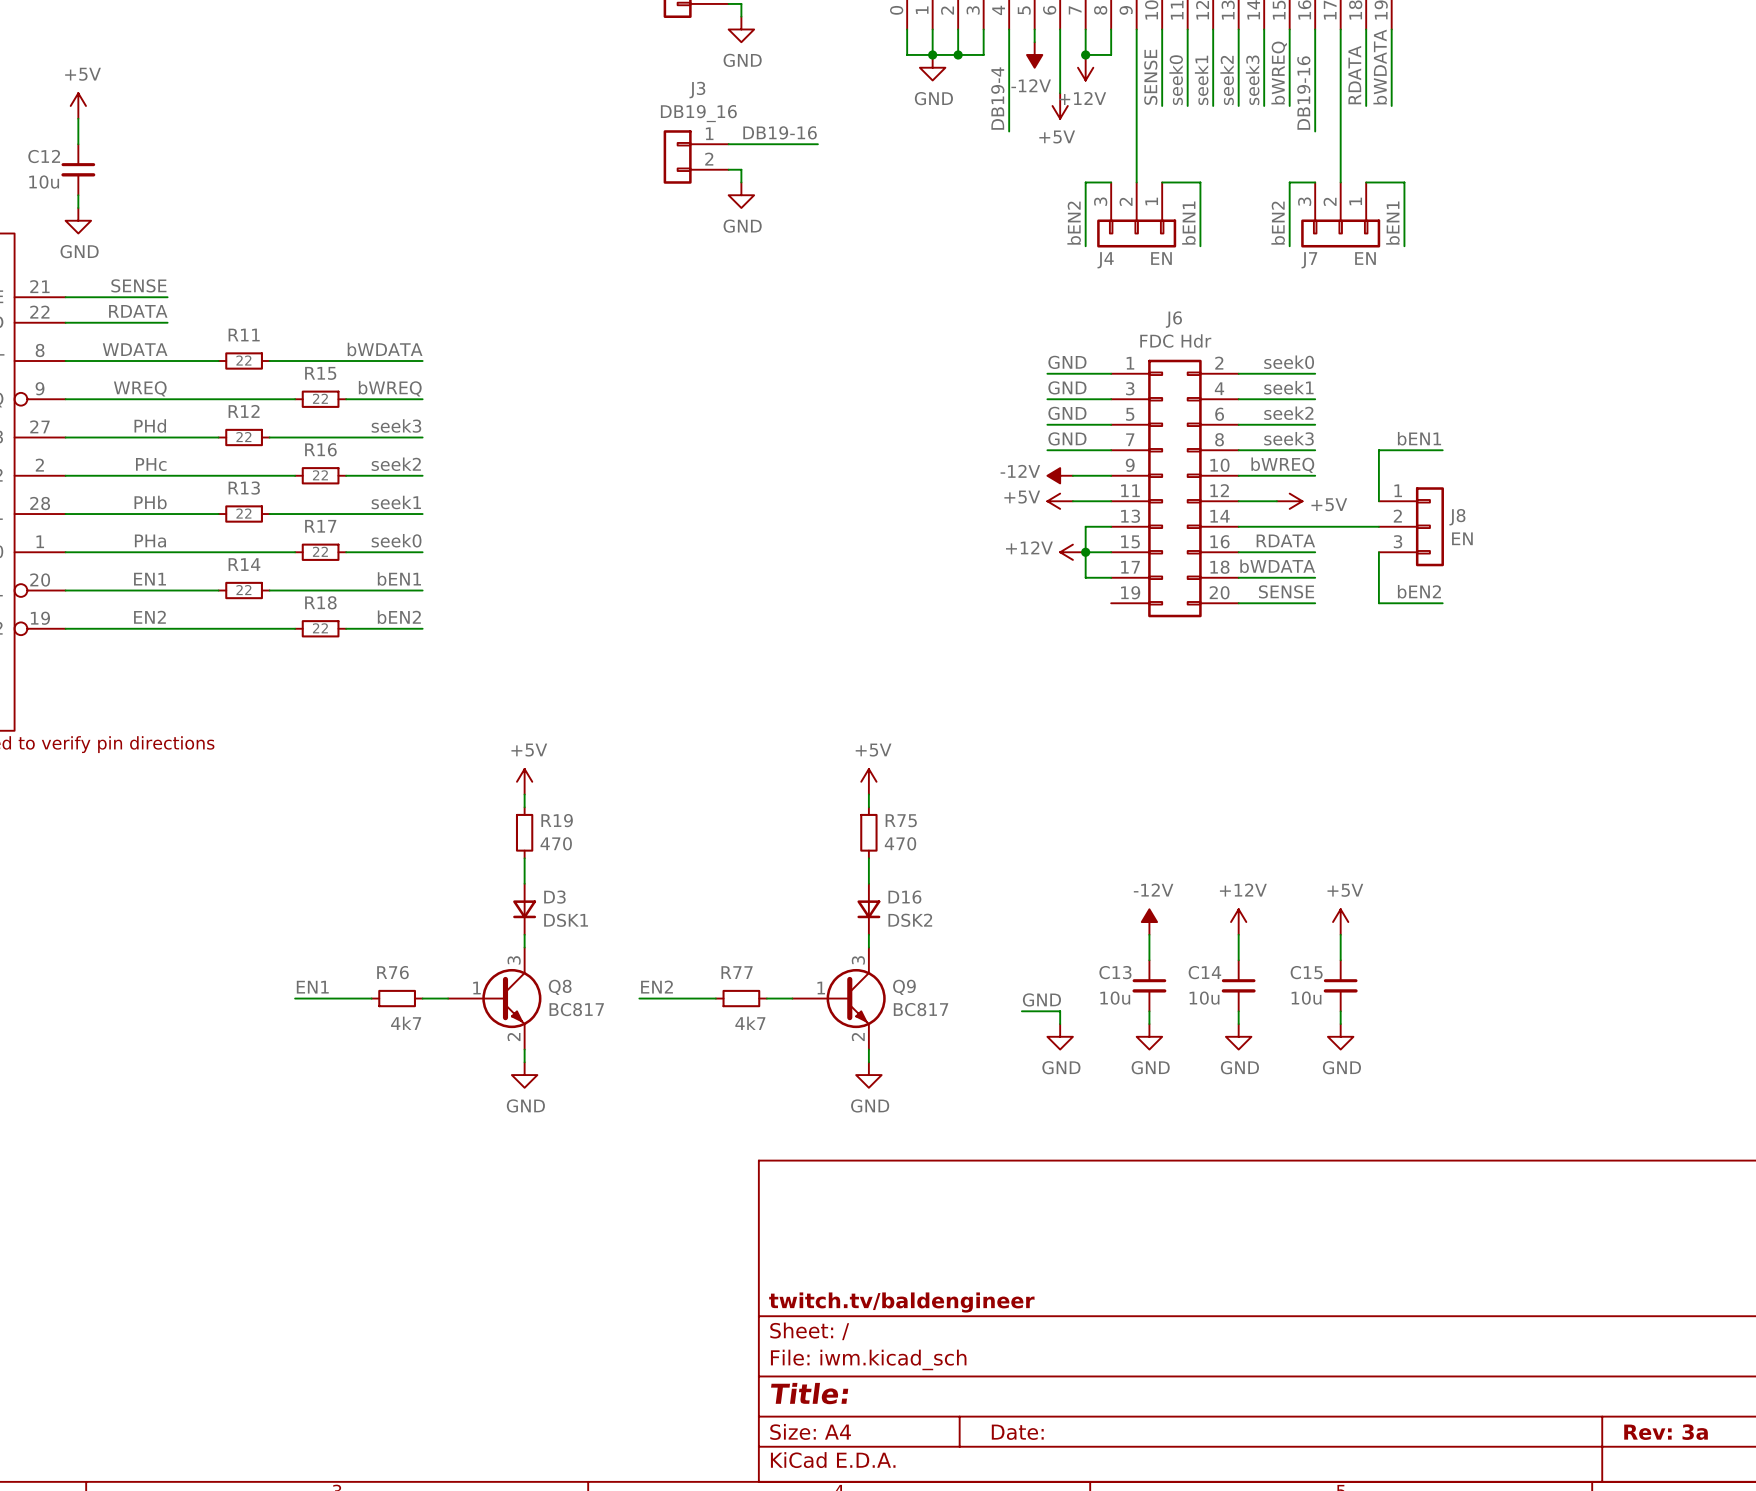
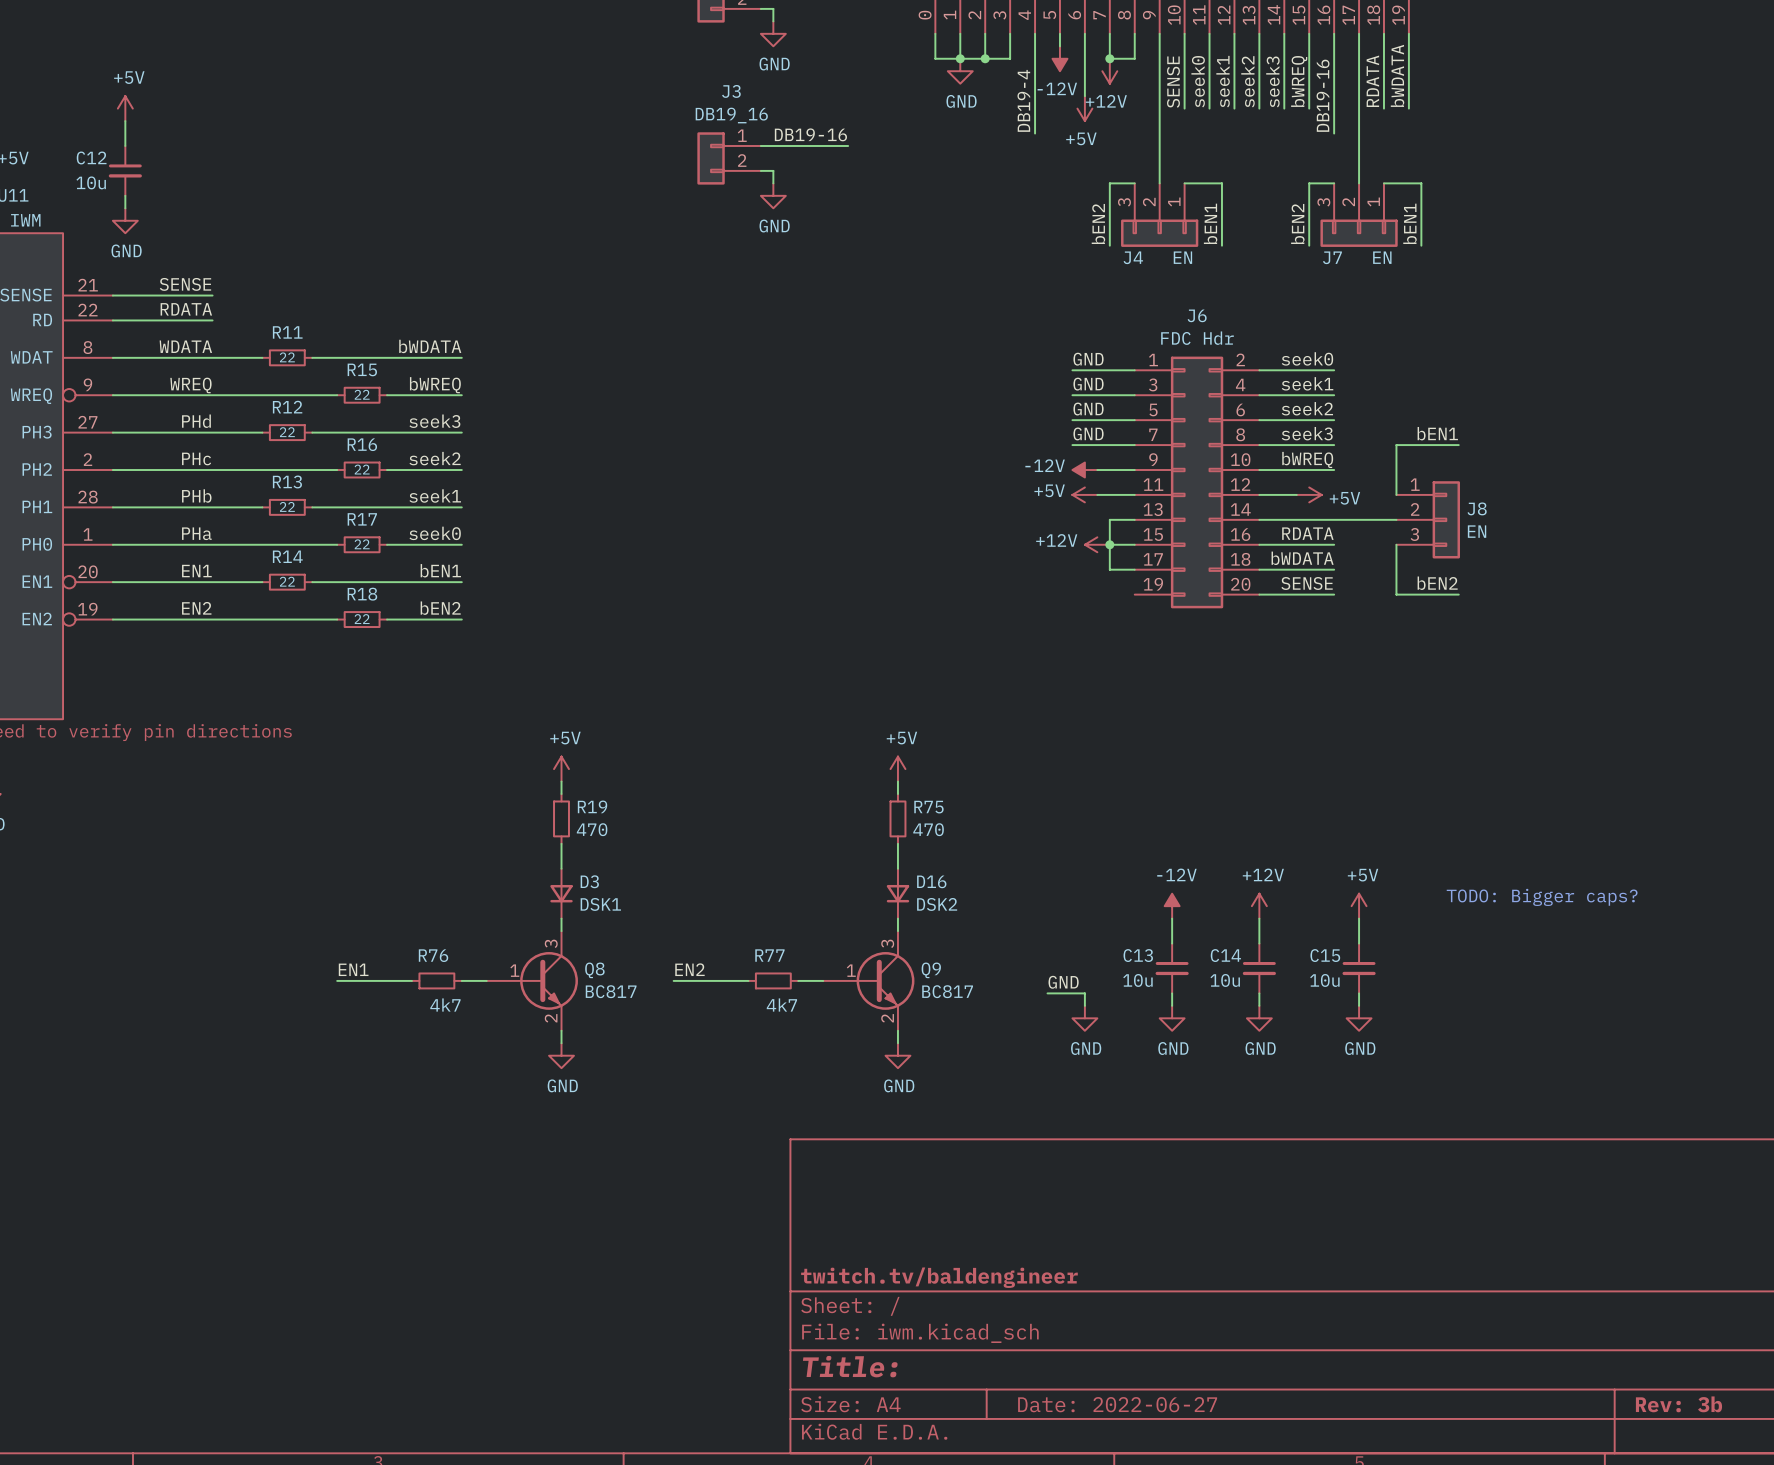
text: none -> TODO: Bigger caps? (1542, 897)
title block: Date: (1017, 1432) -> Date: 2022-06-27 (1117, 1404)
title block: Rev: 3a (1666, 1432) -> Rev: 3b (1678, 1404)

